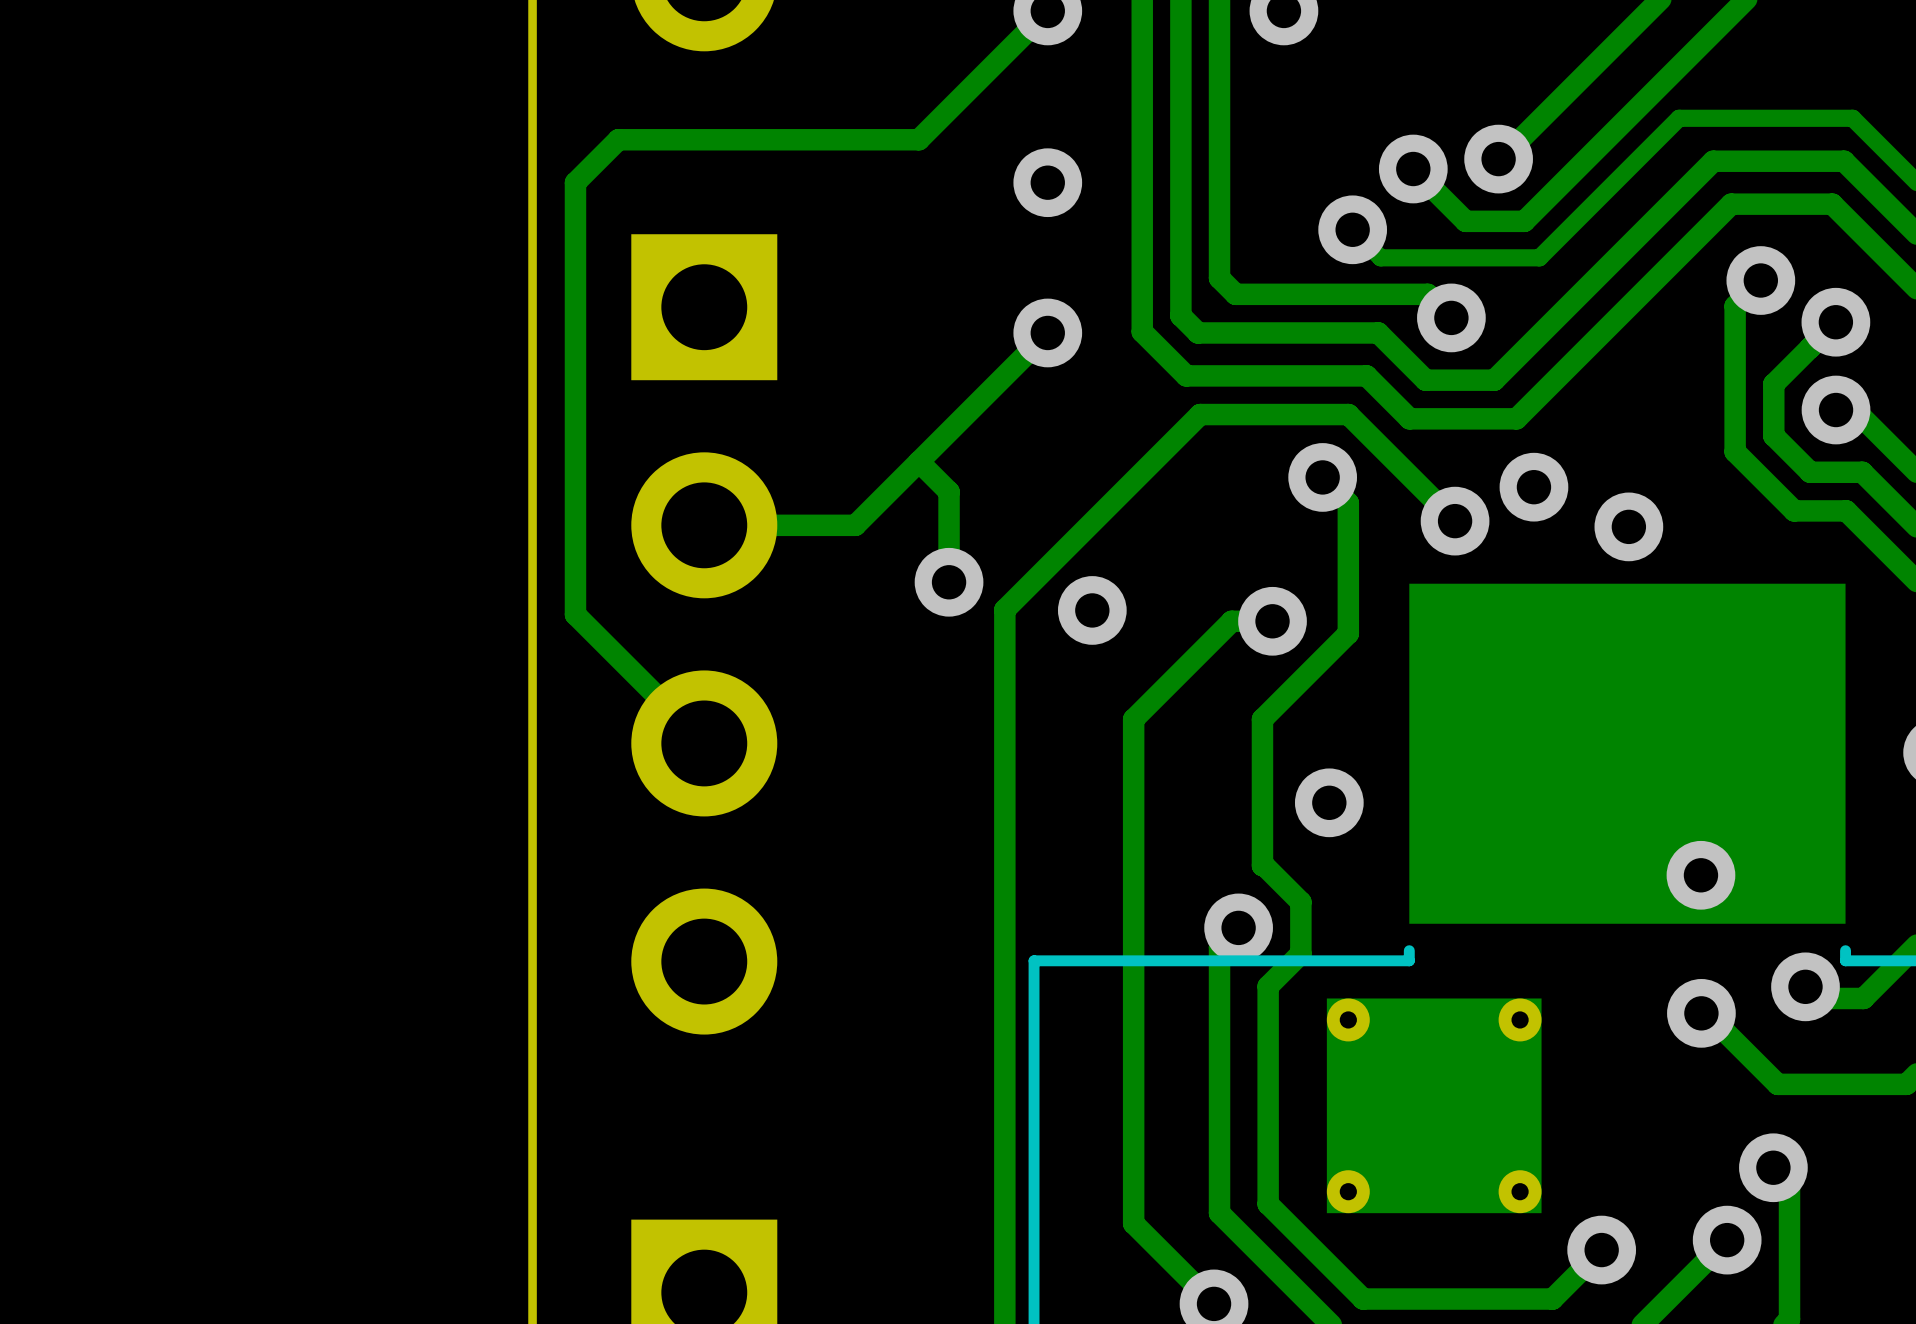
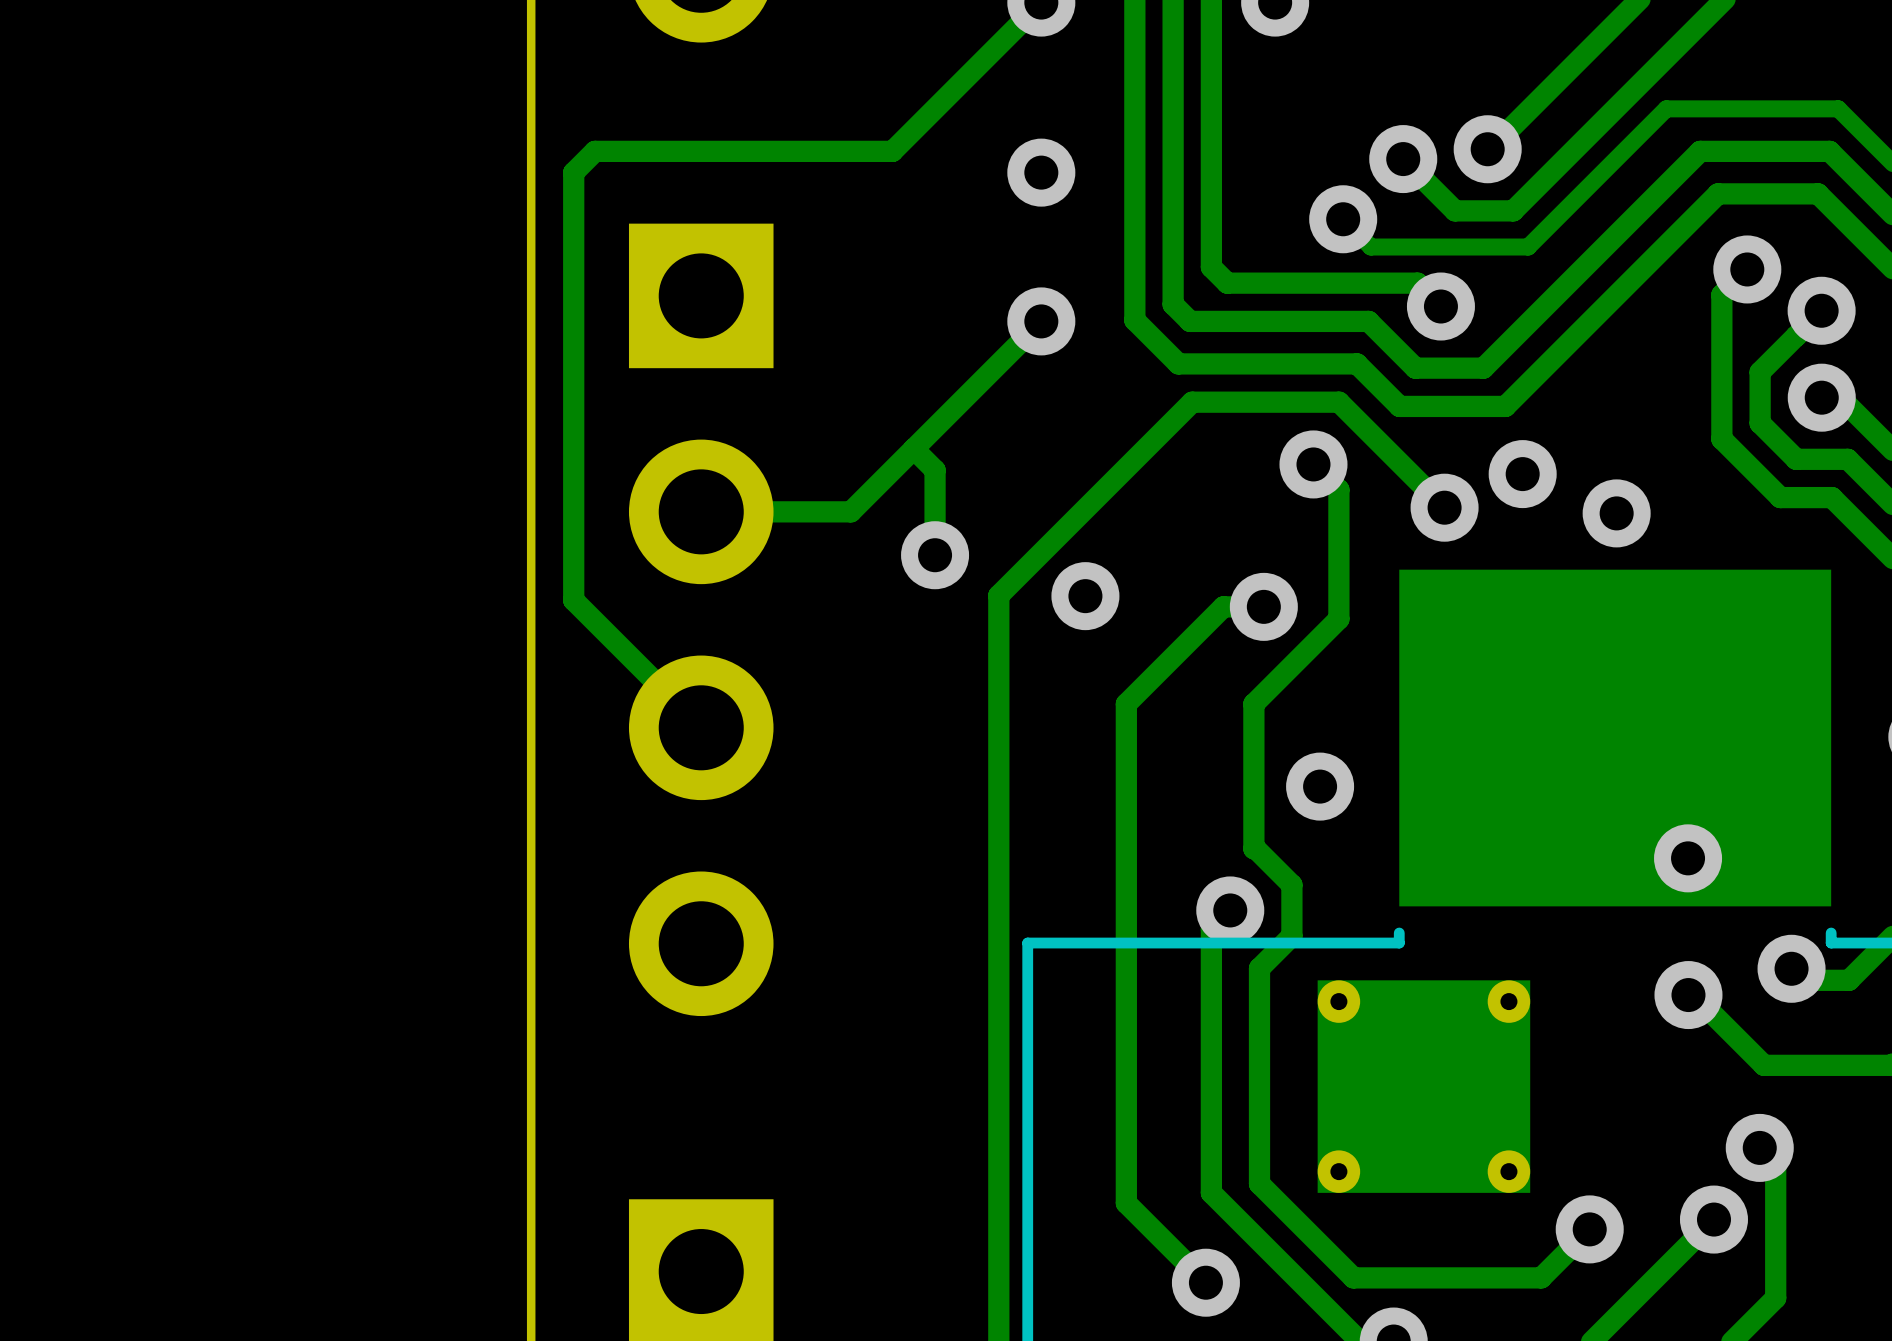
track: (918, 139) (618, 139) (596, 161) -> (913, 130) (892, 151) (594, 151)
track: (940, 483) (949, 491) (949, 582) -> (935, 470) (935, 555)
via position: (949, 582) -> (935, 555)

